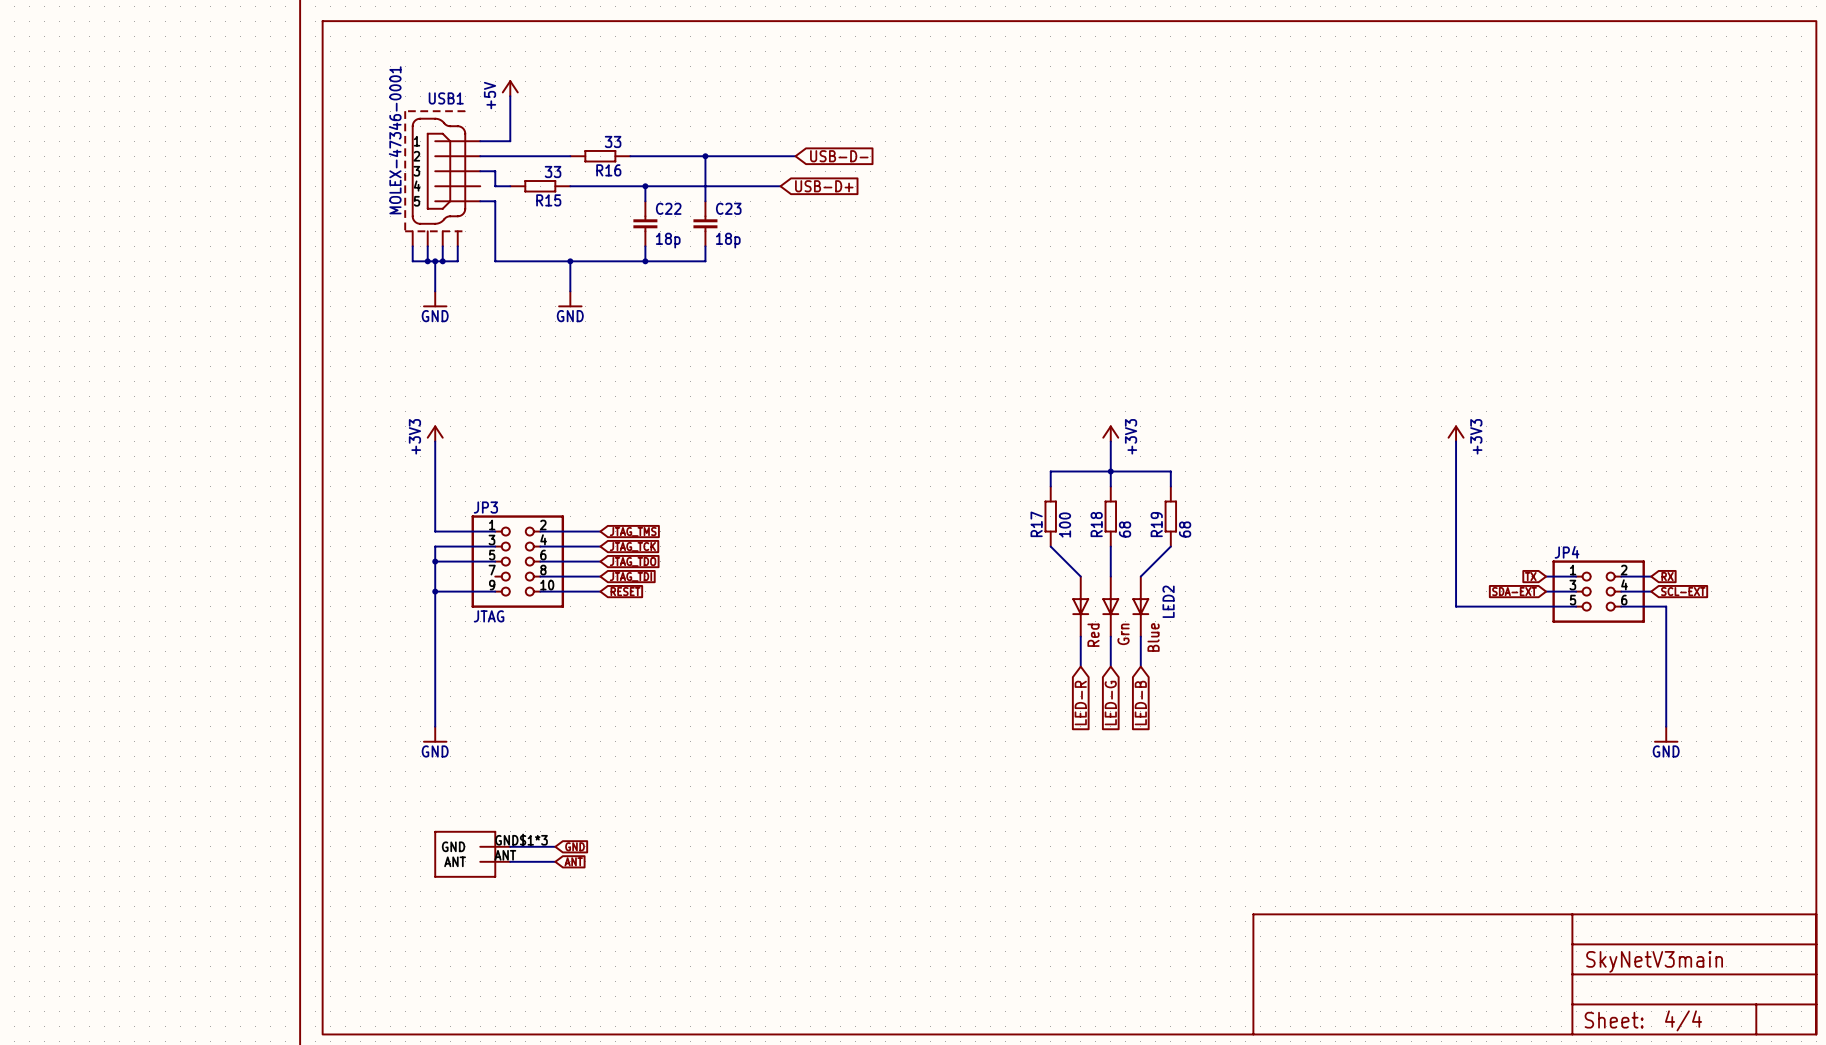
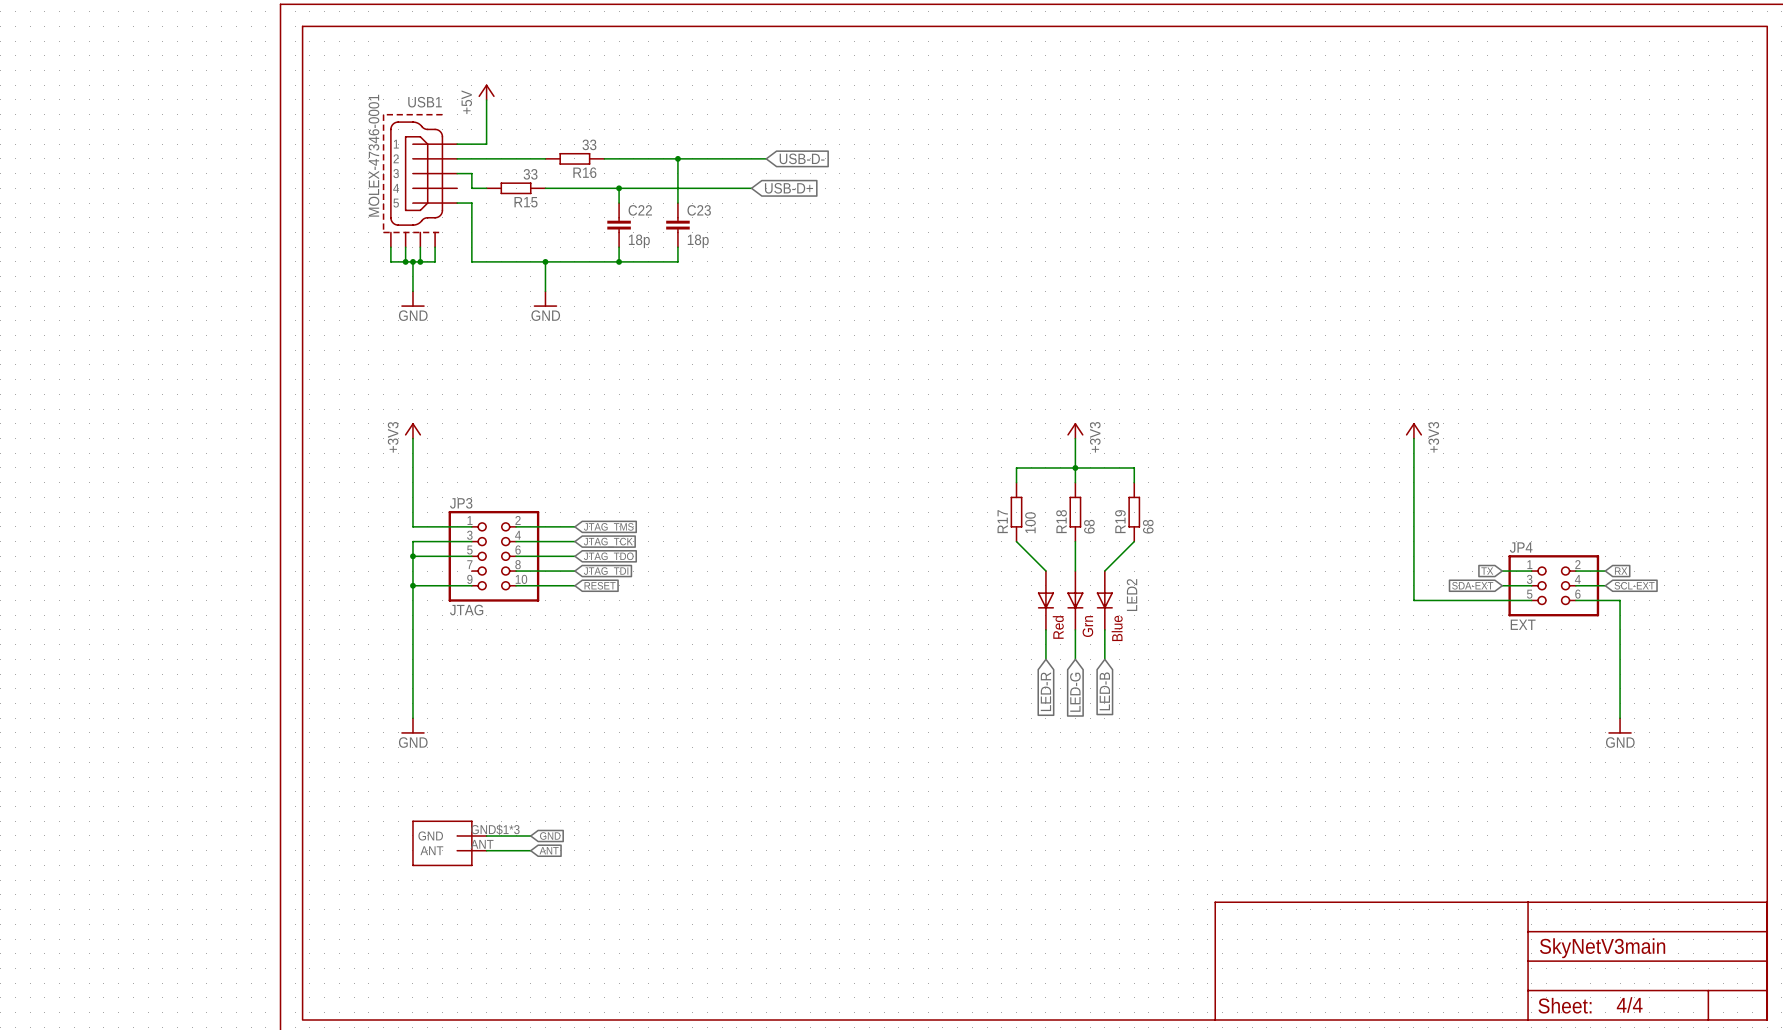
JP4 value: none -> EXT (1523, 624)

